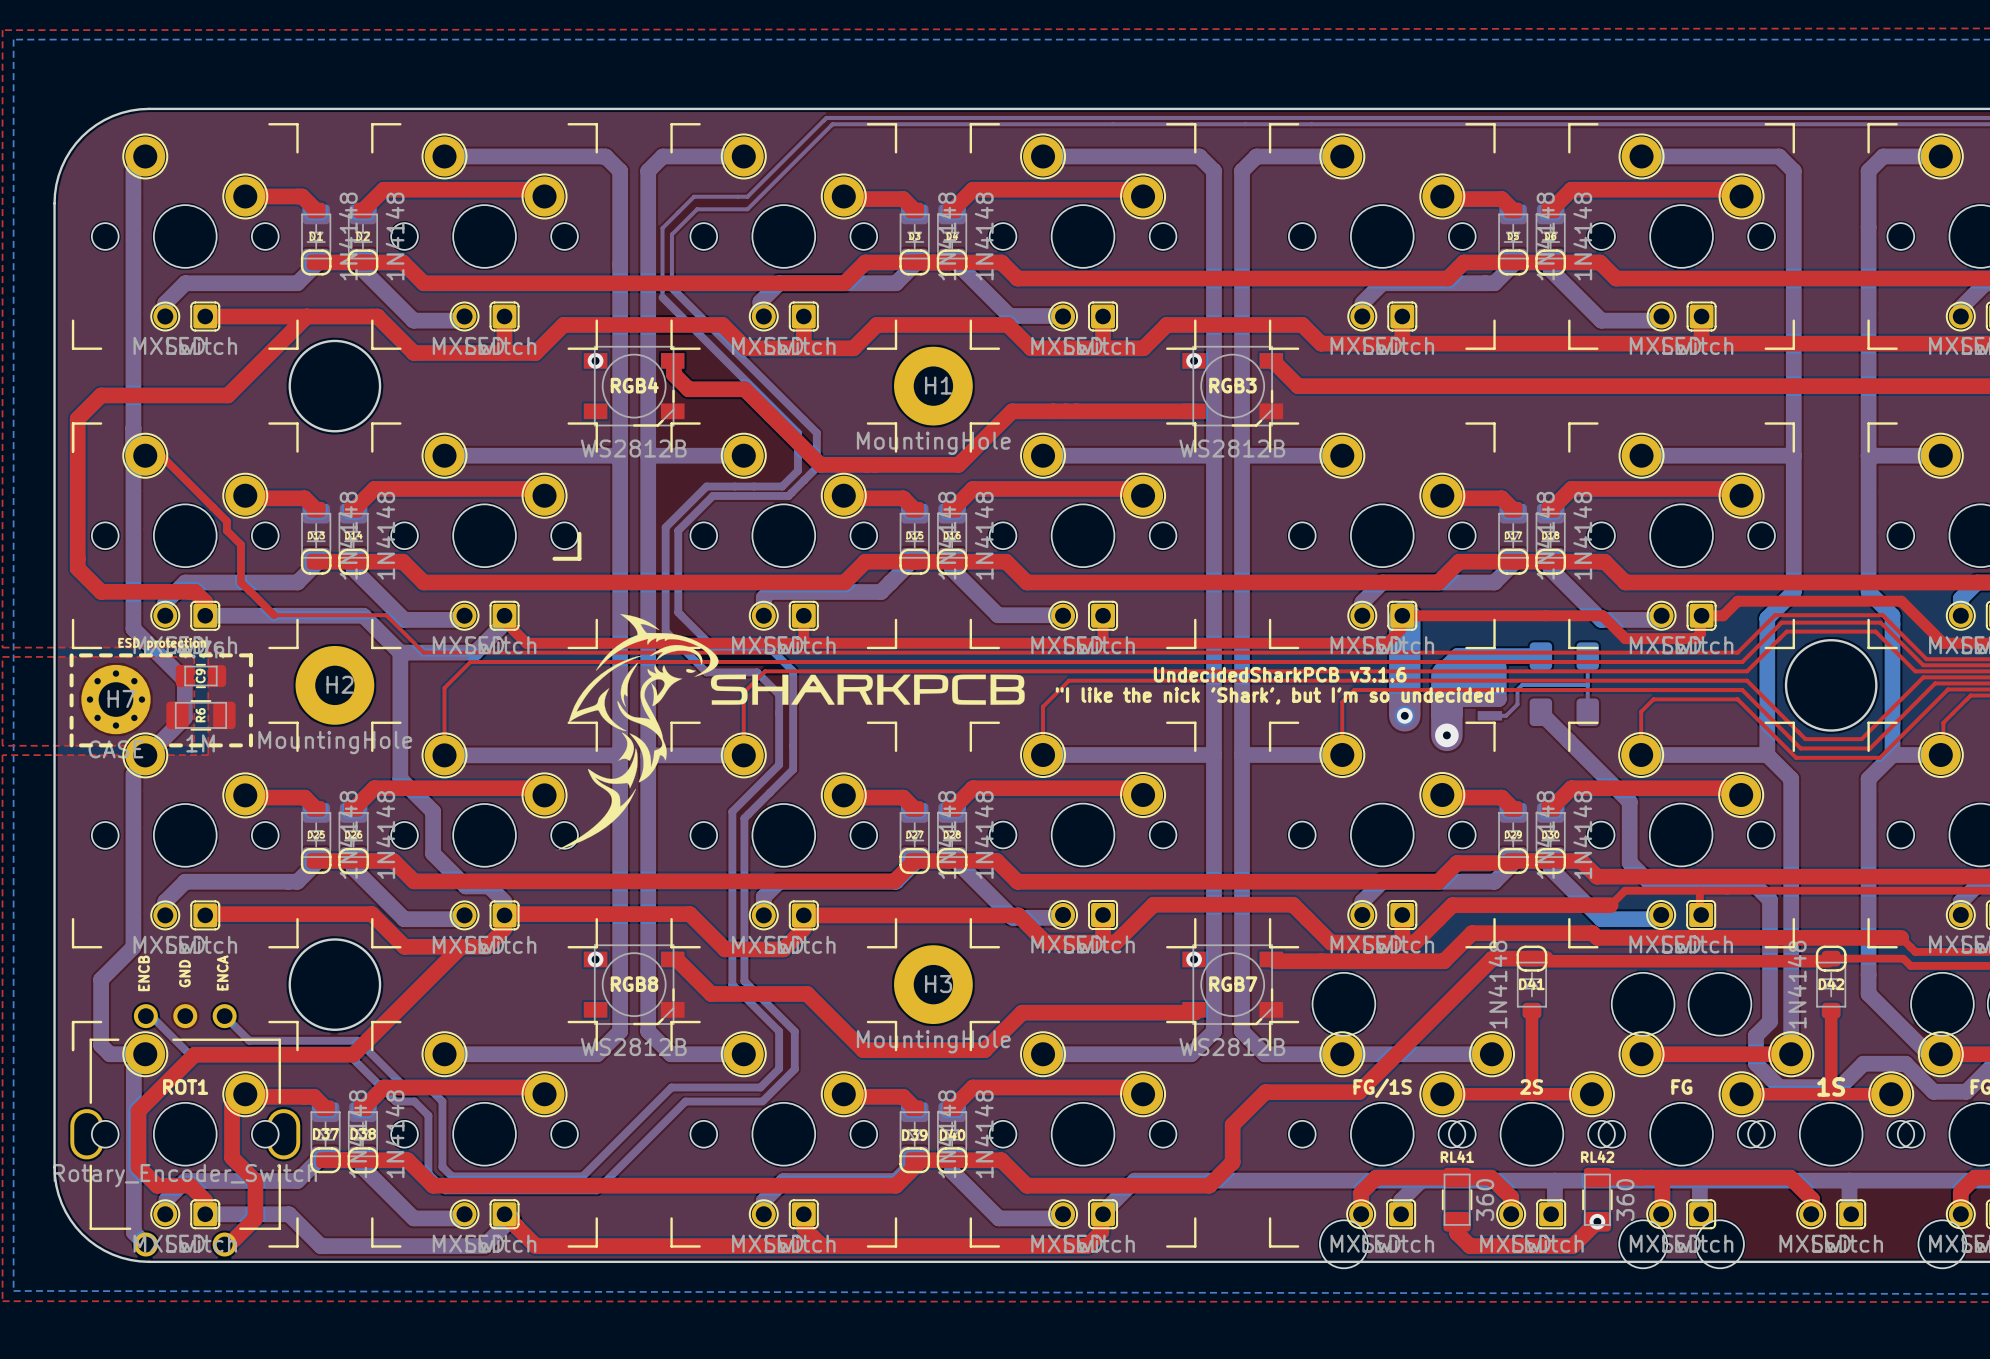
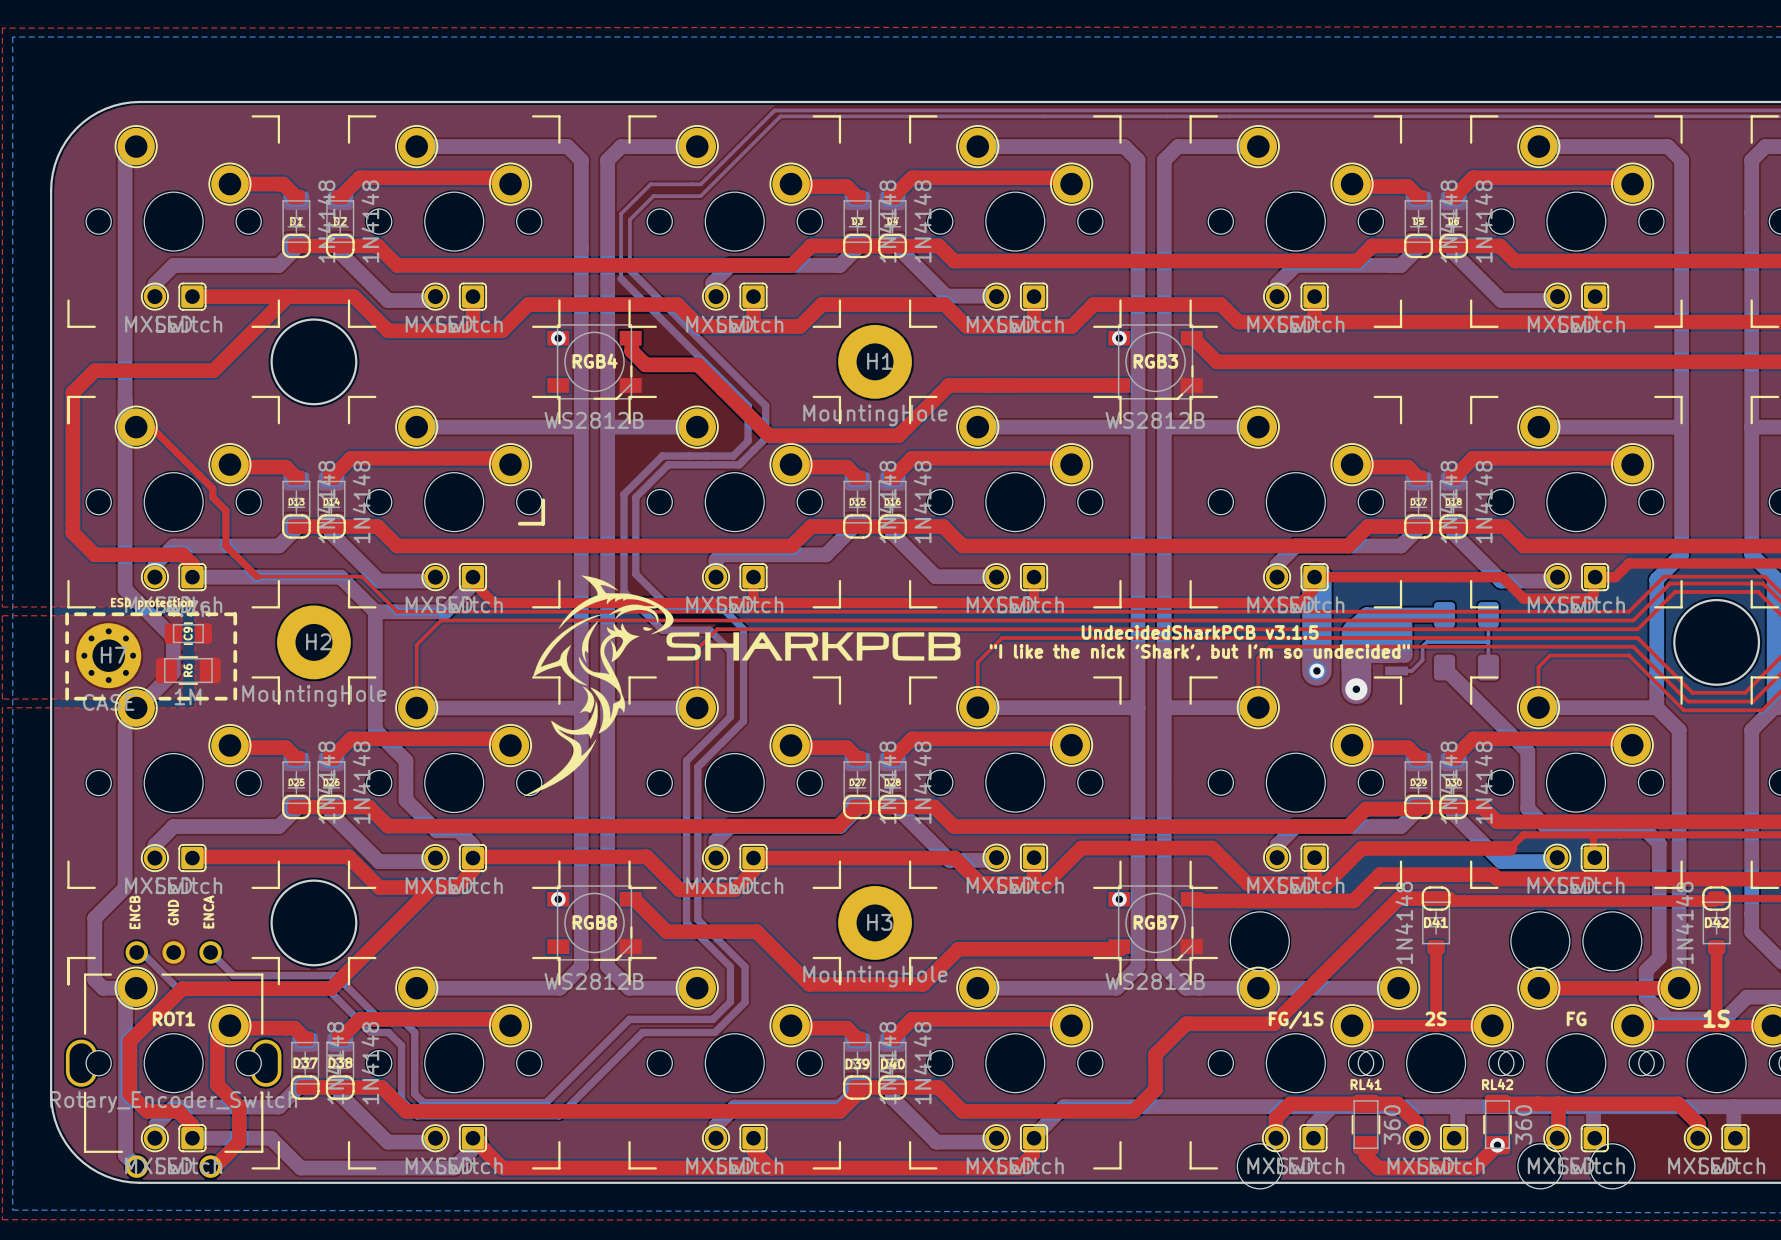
text: UndecidedSharkPCB v3.1.6 (1280, 674) -> UndecidedSharkPCB v3.1.5 (1200, 632)

